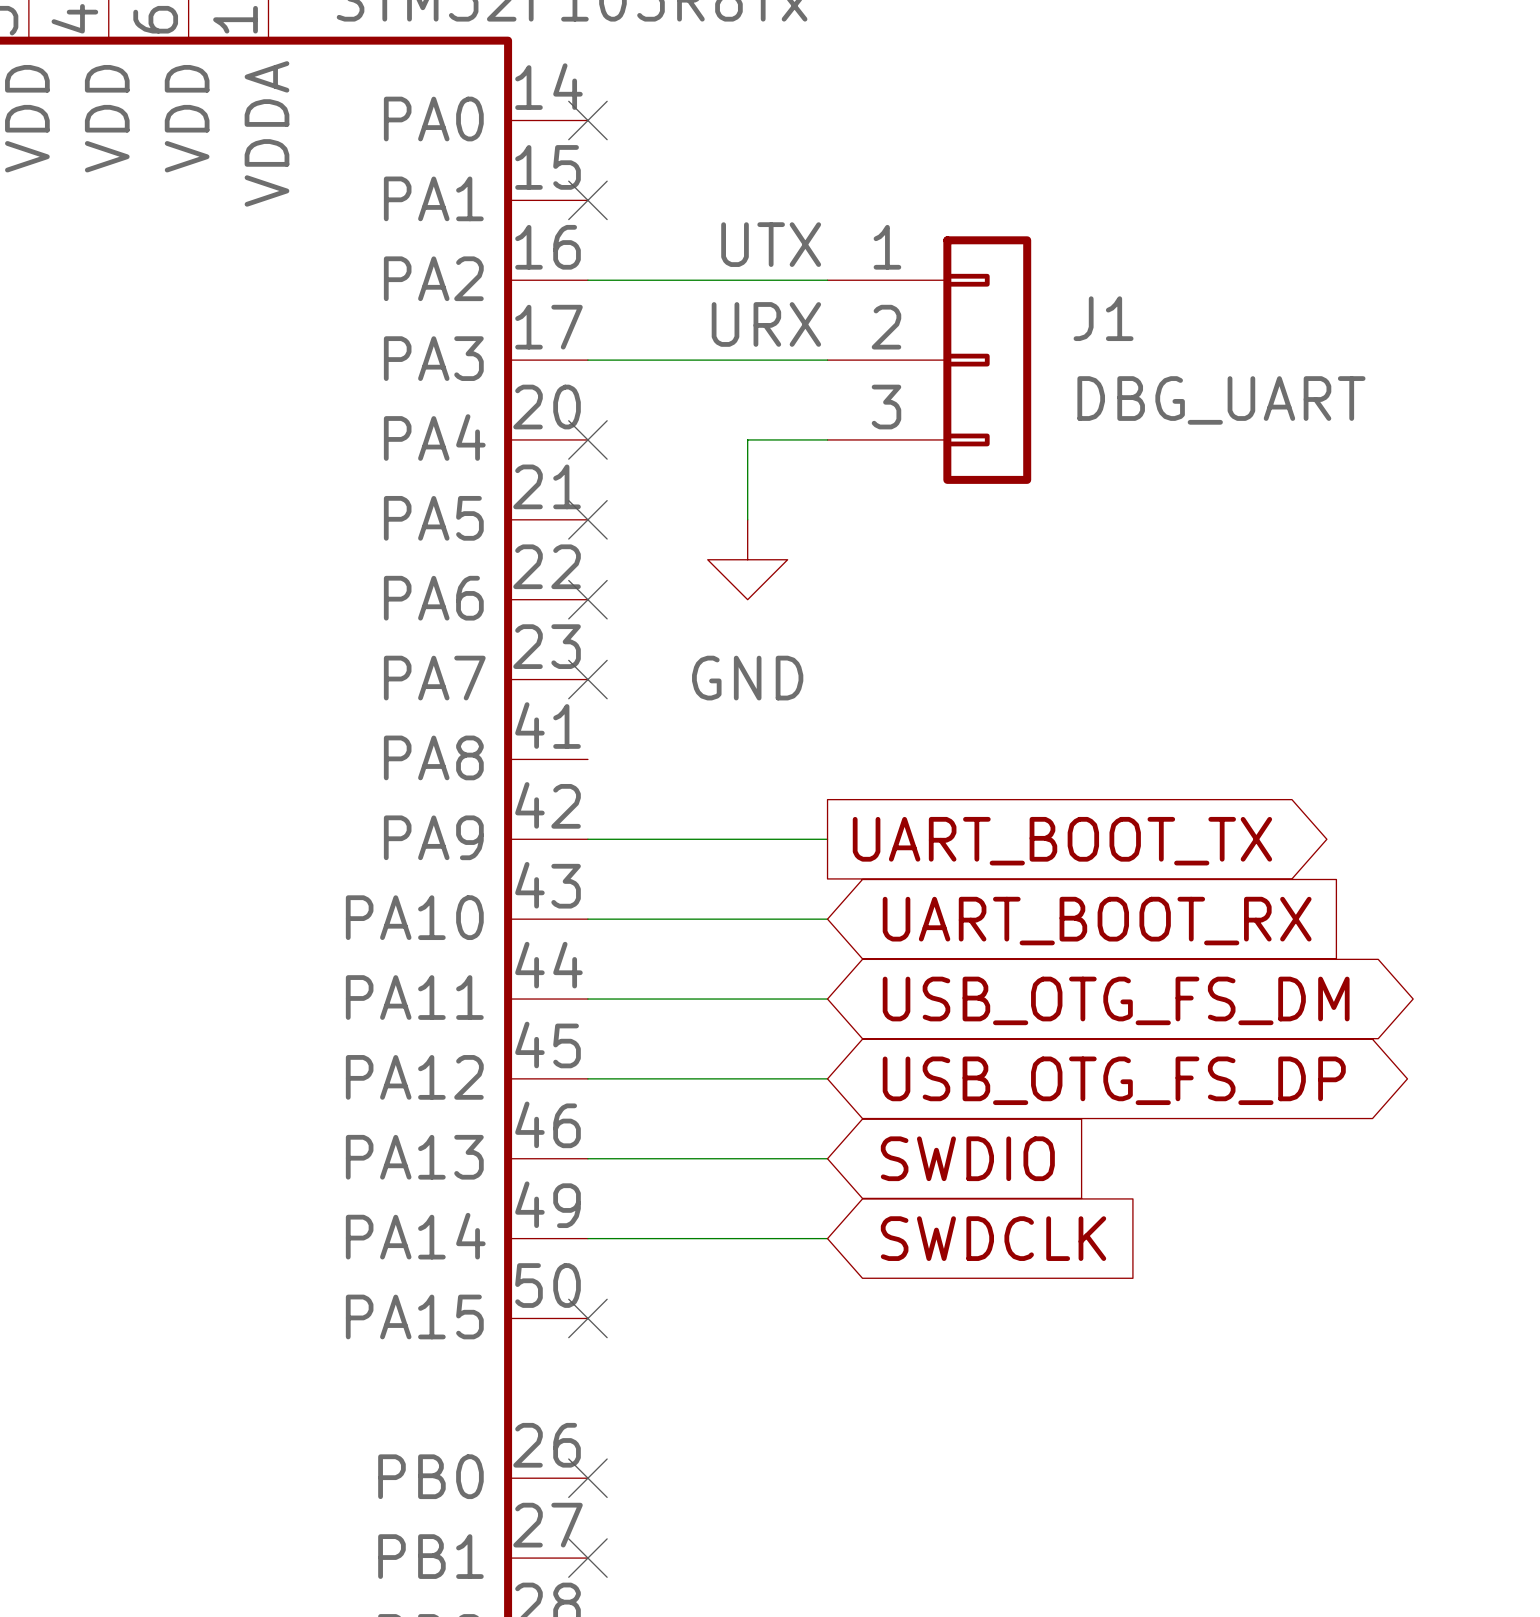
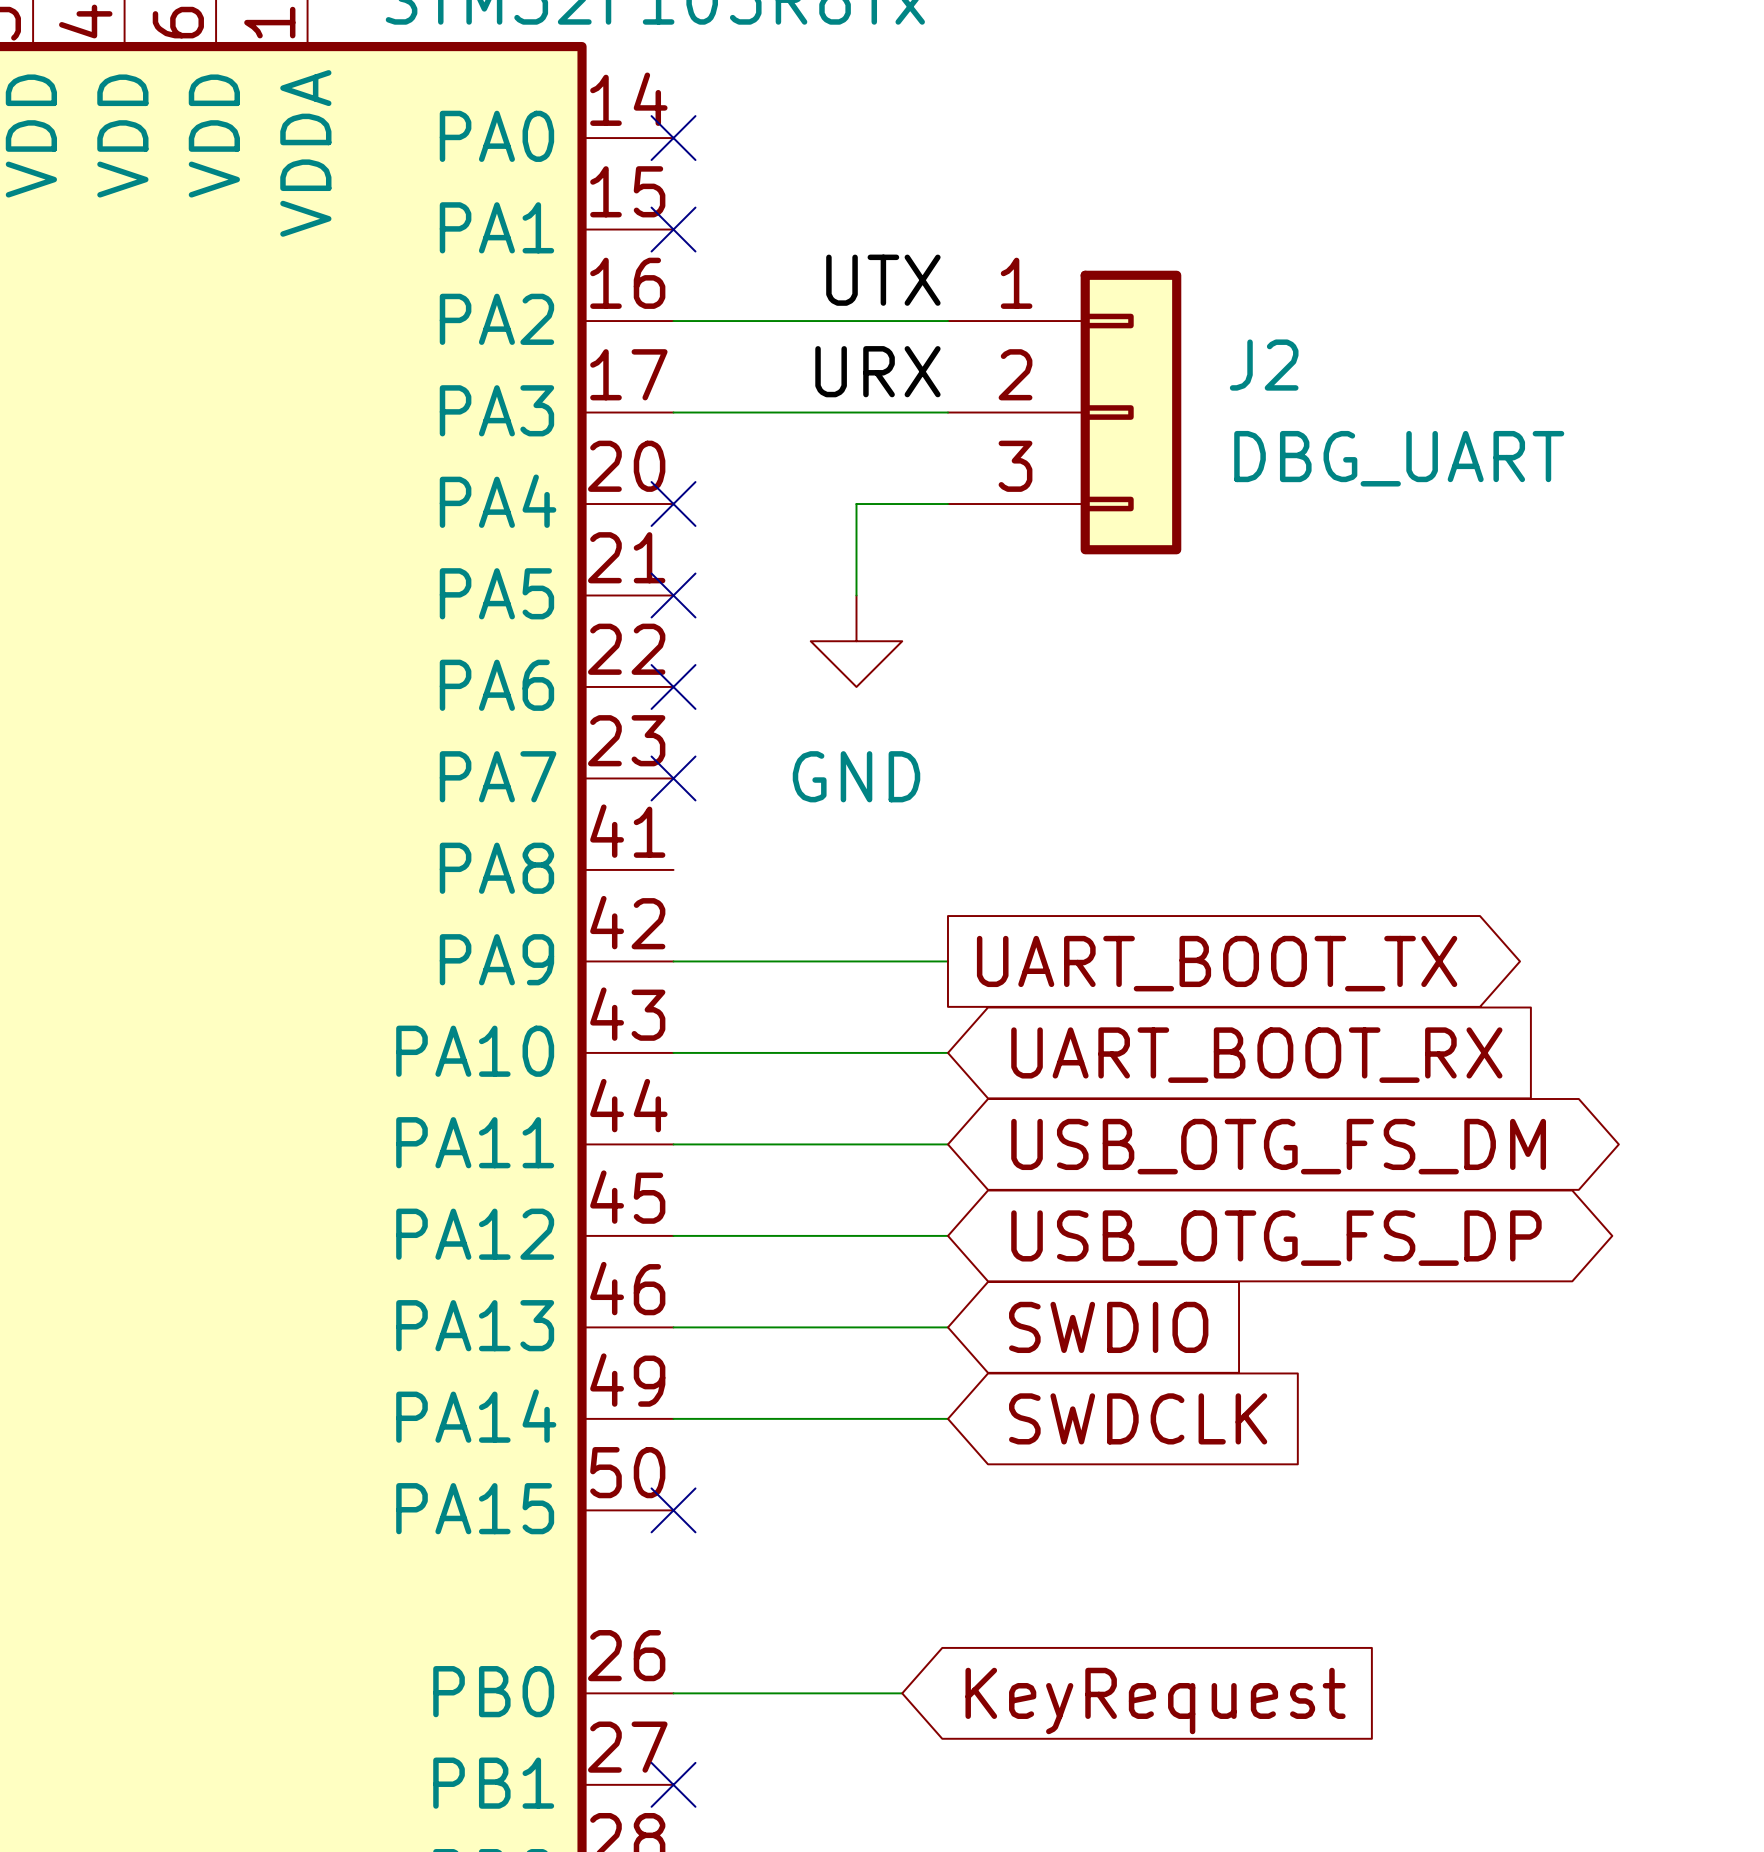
J1 name: J1 (1103, 318) -> J2 (1264, 365)
wire: none -> (673, 1693) (902, 1693)
no-connect mark: (587, 1478) -> none
global label: none -> KeyRequest (1155, 1700)

